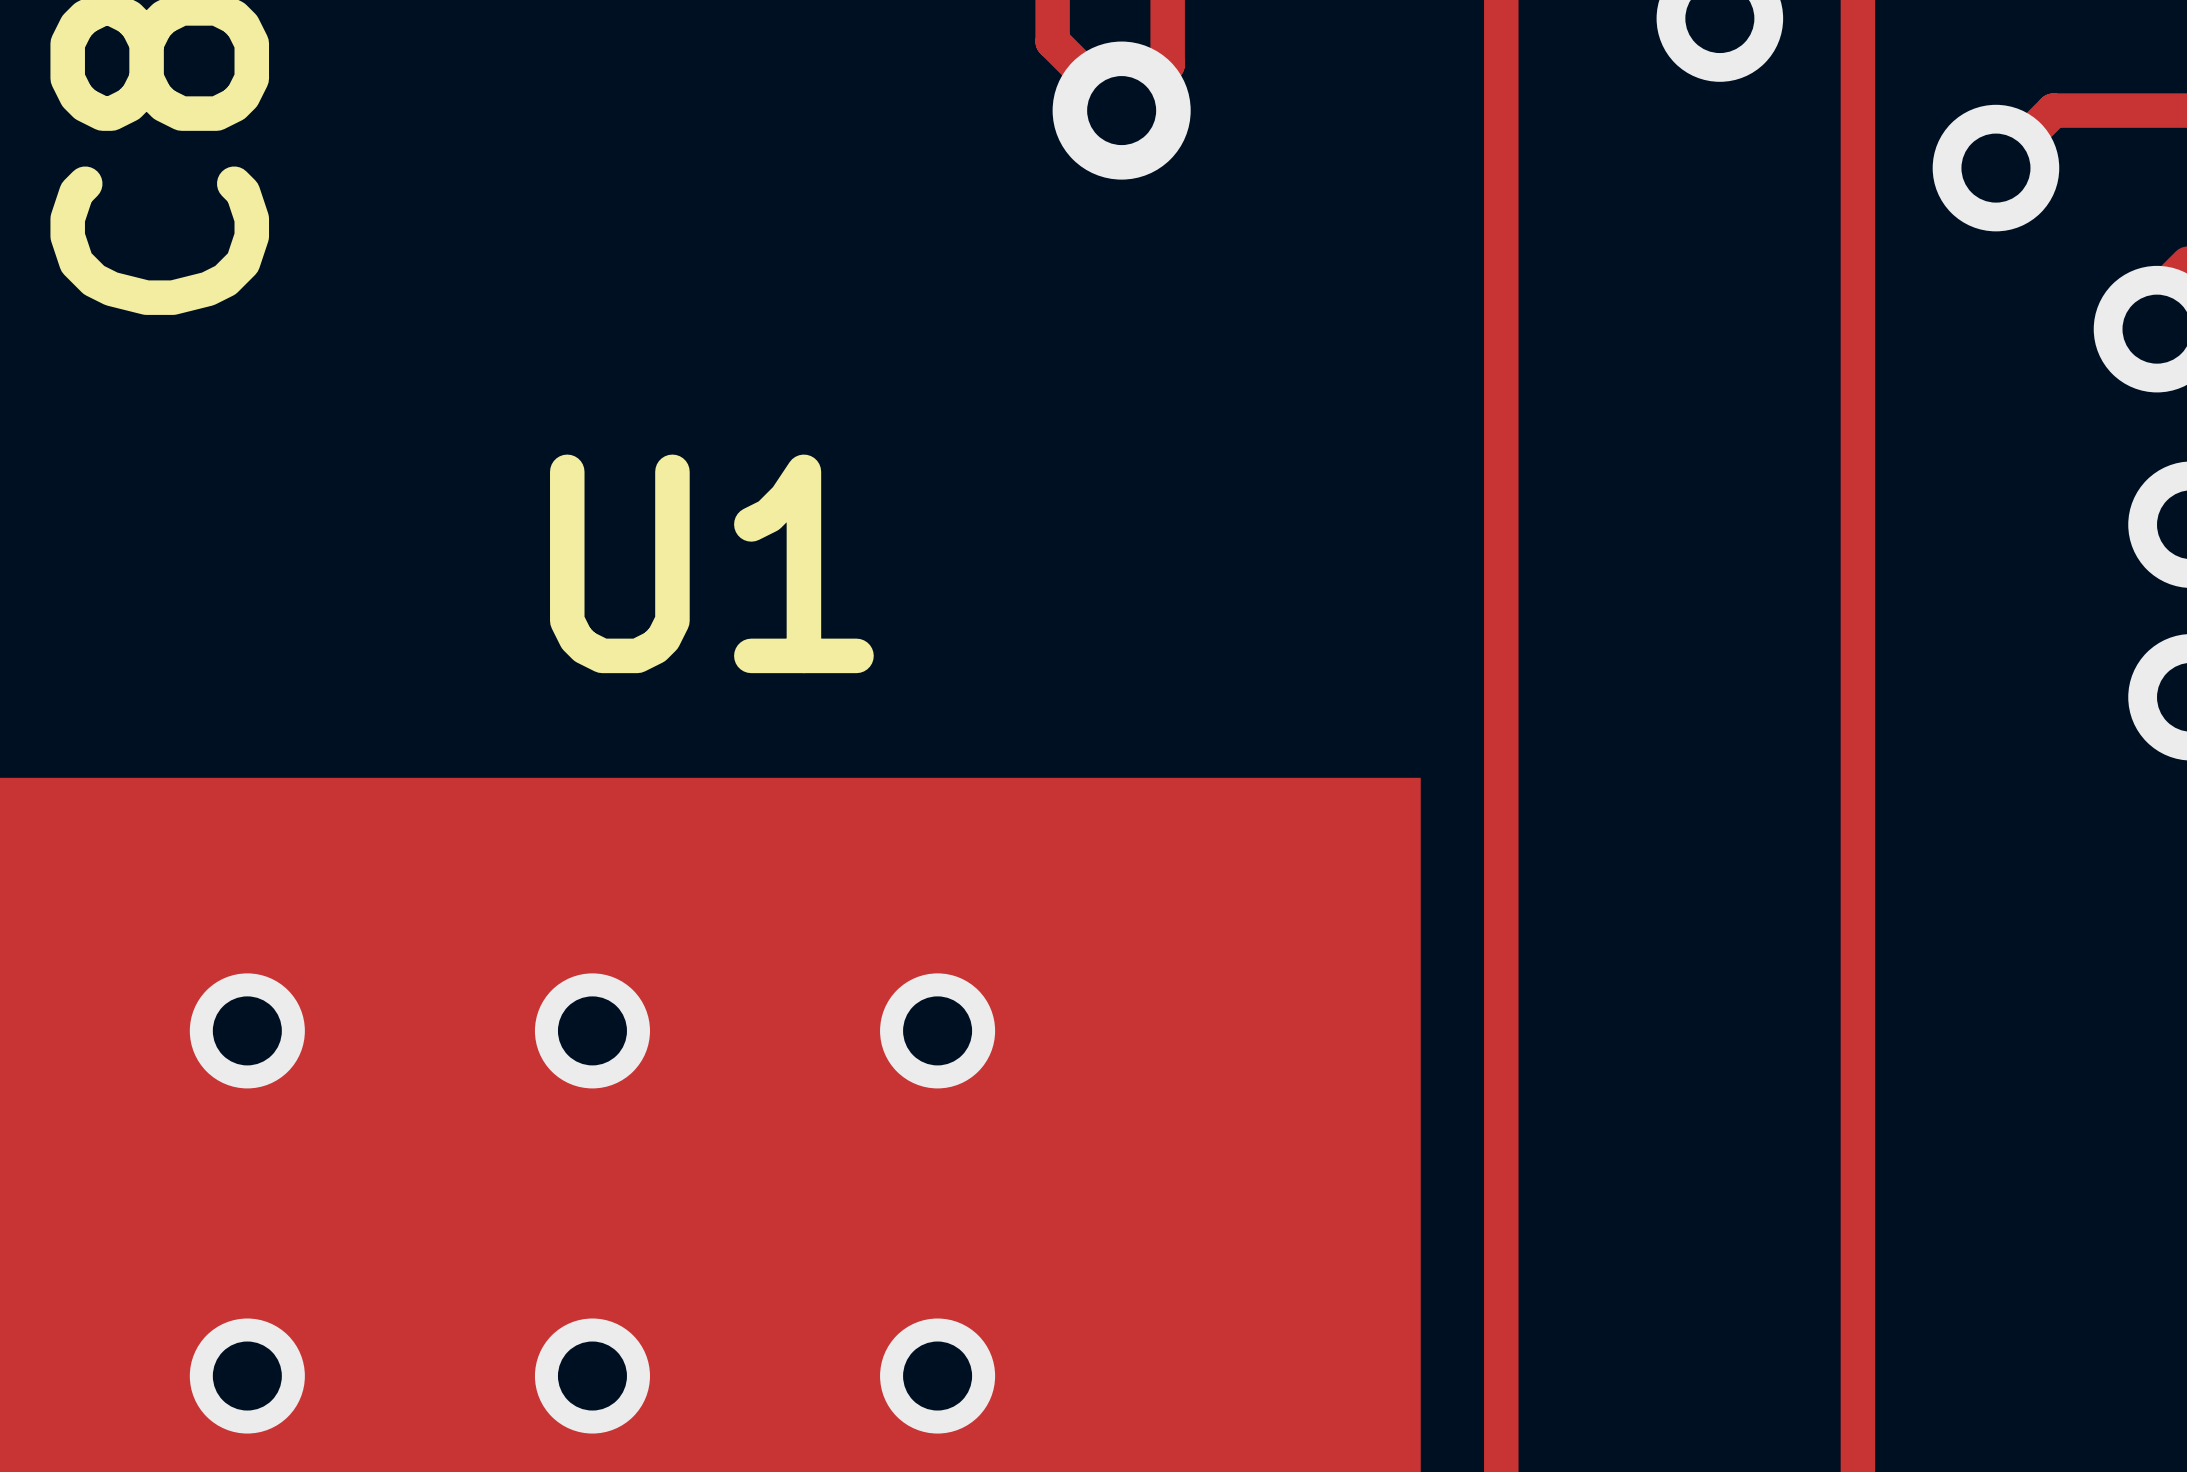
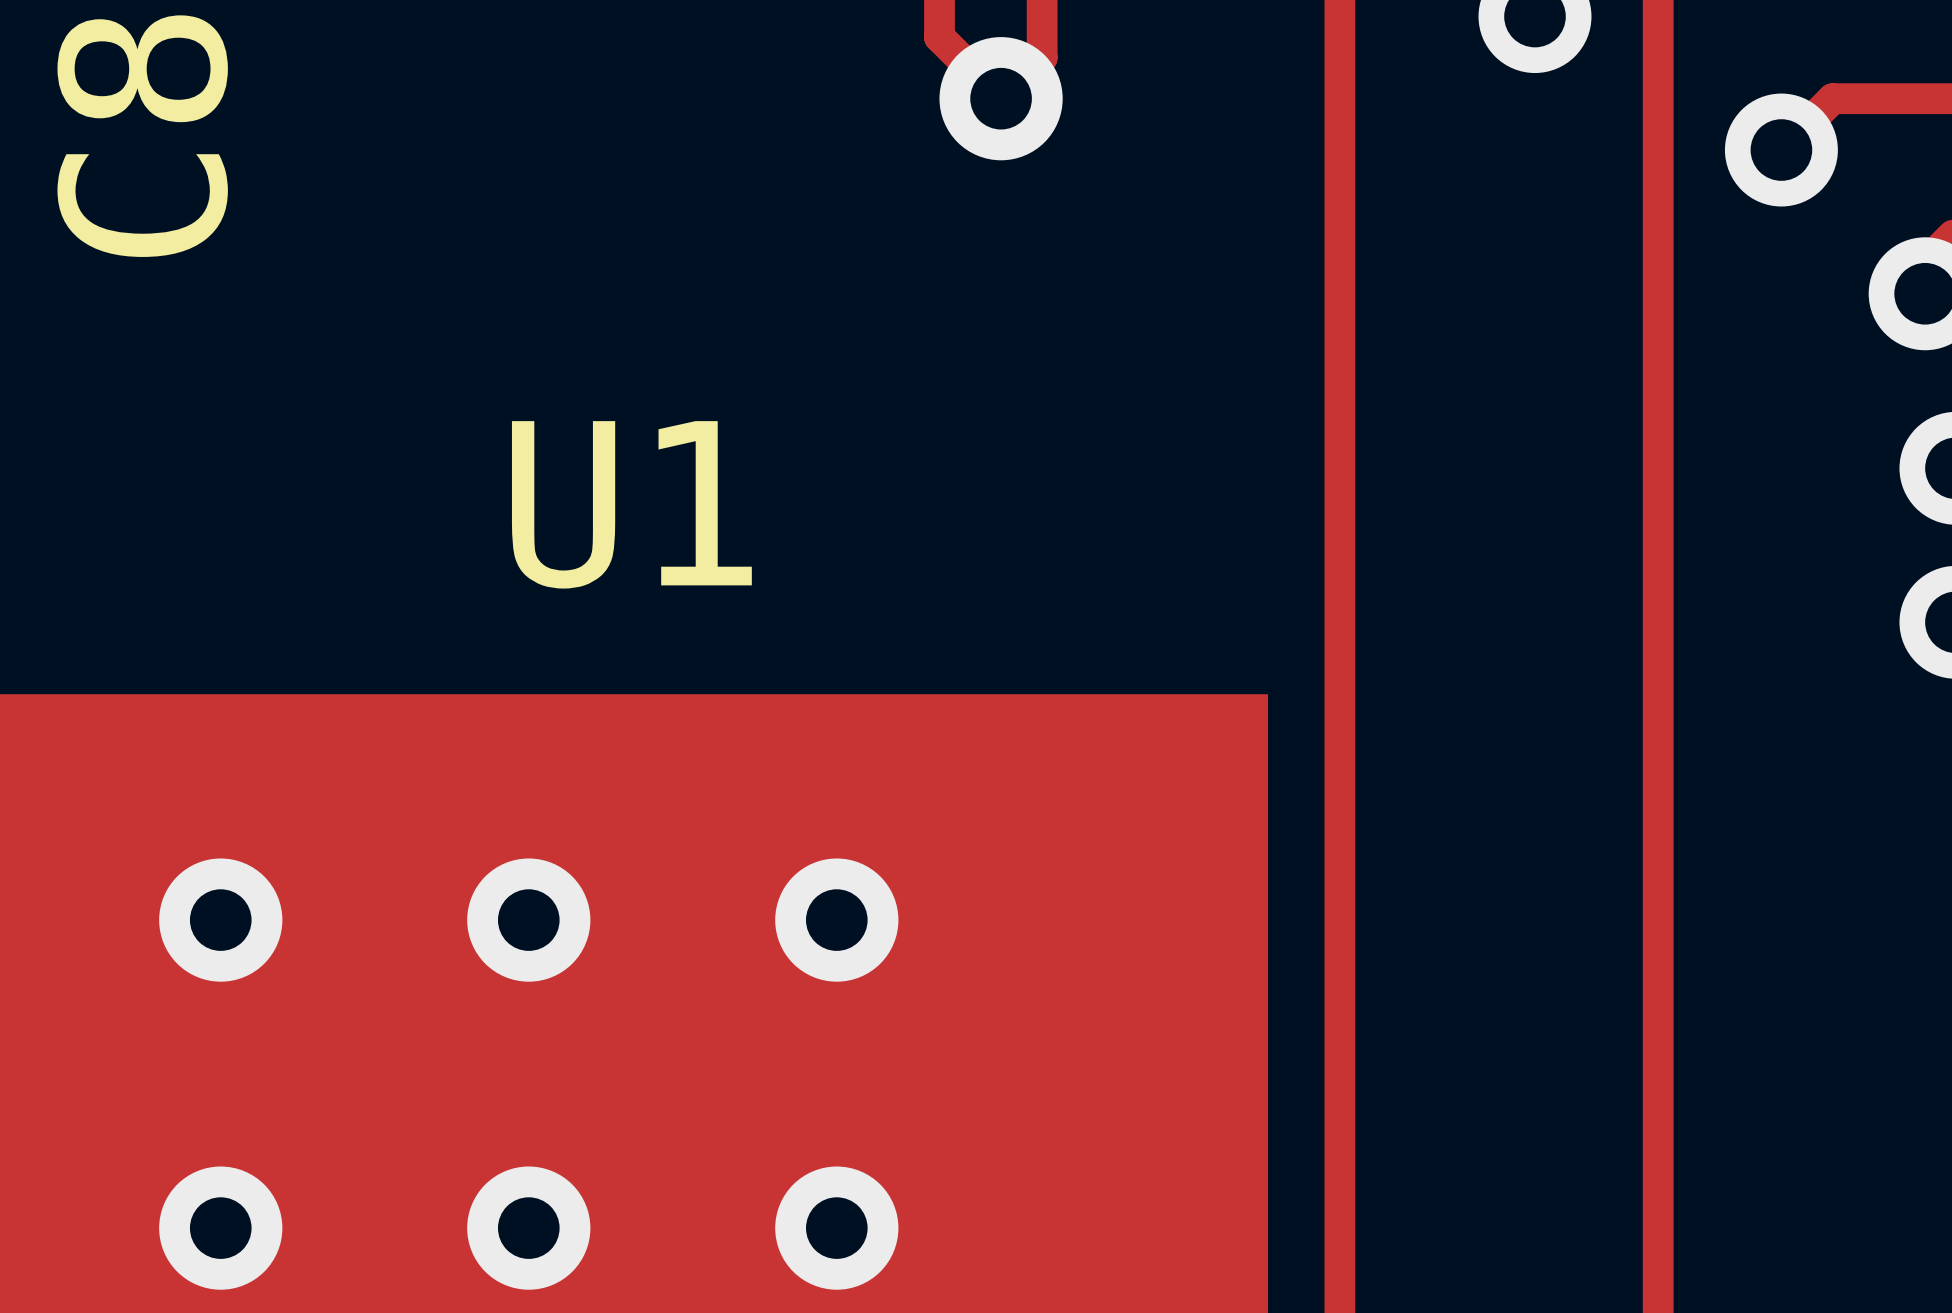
via size: [189, 973, 305, 1089] -> [159, 858, 283, 982]
via size: [534, 973, 650, 1089] -> [467, 858, 591, 982]
via size: [880, 973, 996, 1089] -> [775, 858, 899, 982]
via size: [189, 1318, 305, 1434] -> [159, 1166, 283, 1290]
via size: [534, 1318, 650, 1434] -> [467, 1166, 591, 1290]
via size: [880, 1318, 996, 1434] -> [775, 1166, 899, 1290]

